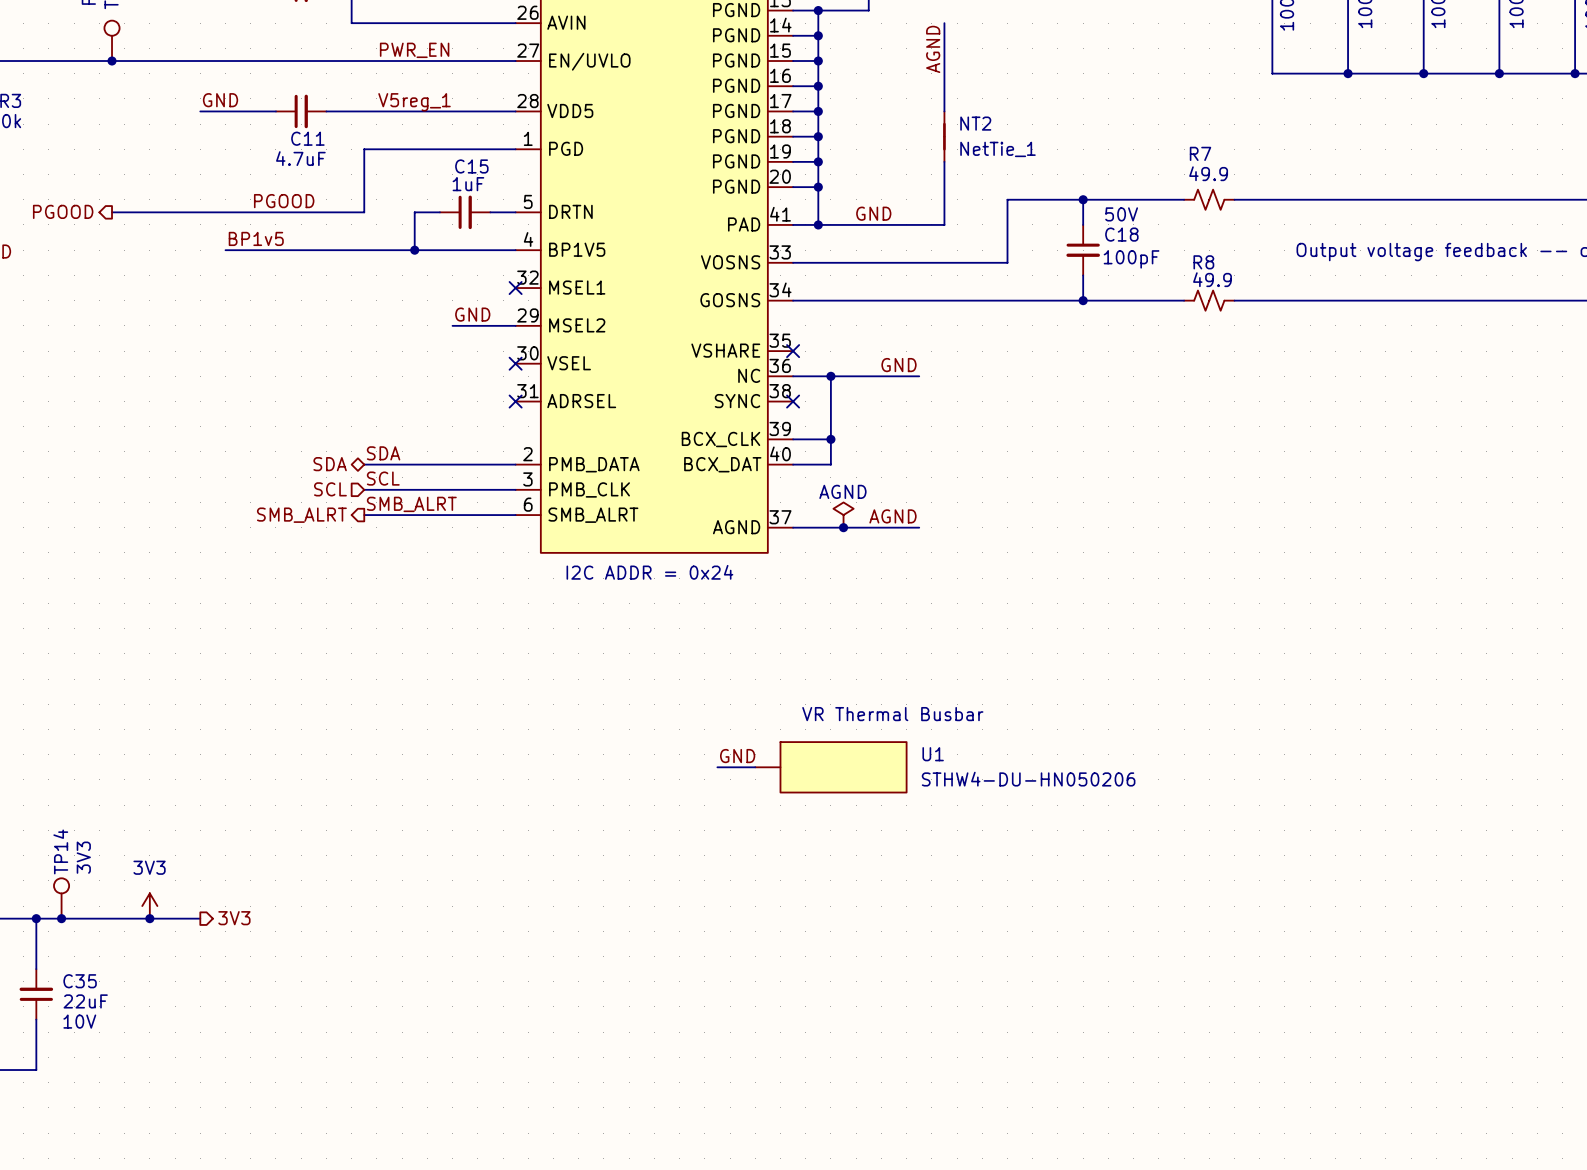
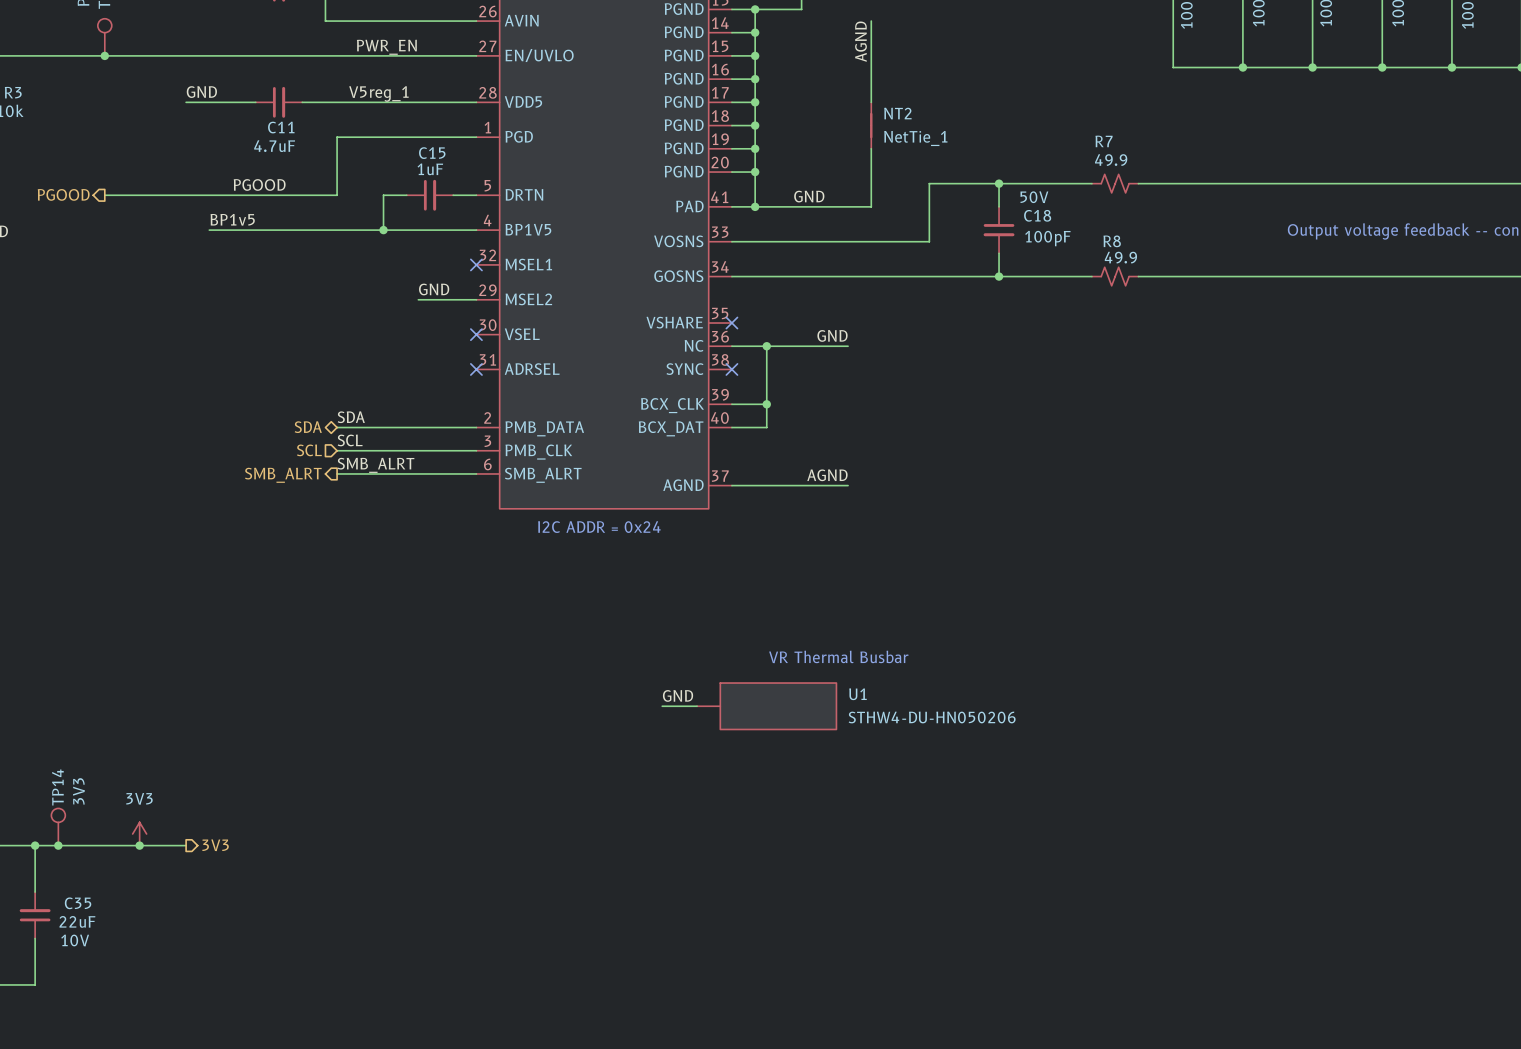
power symbol: AGND (843, 515) -> none
junction: (843, 527) -> none

